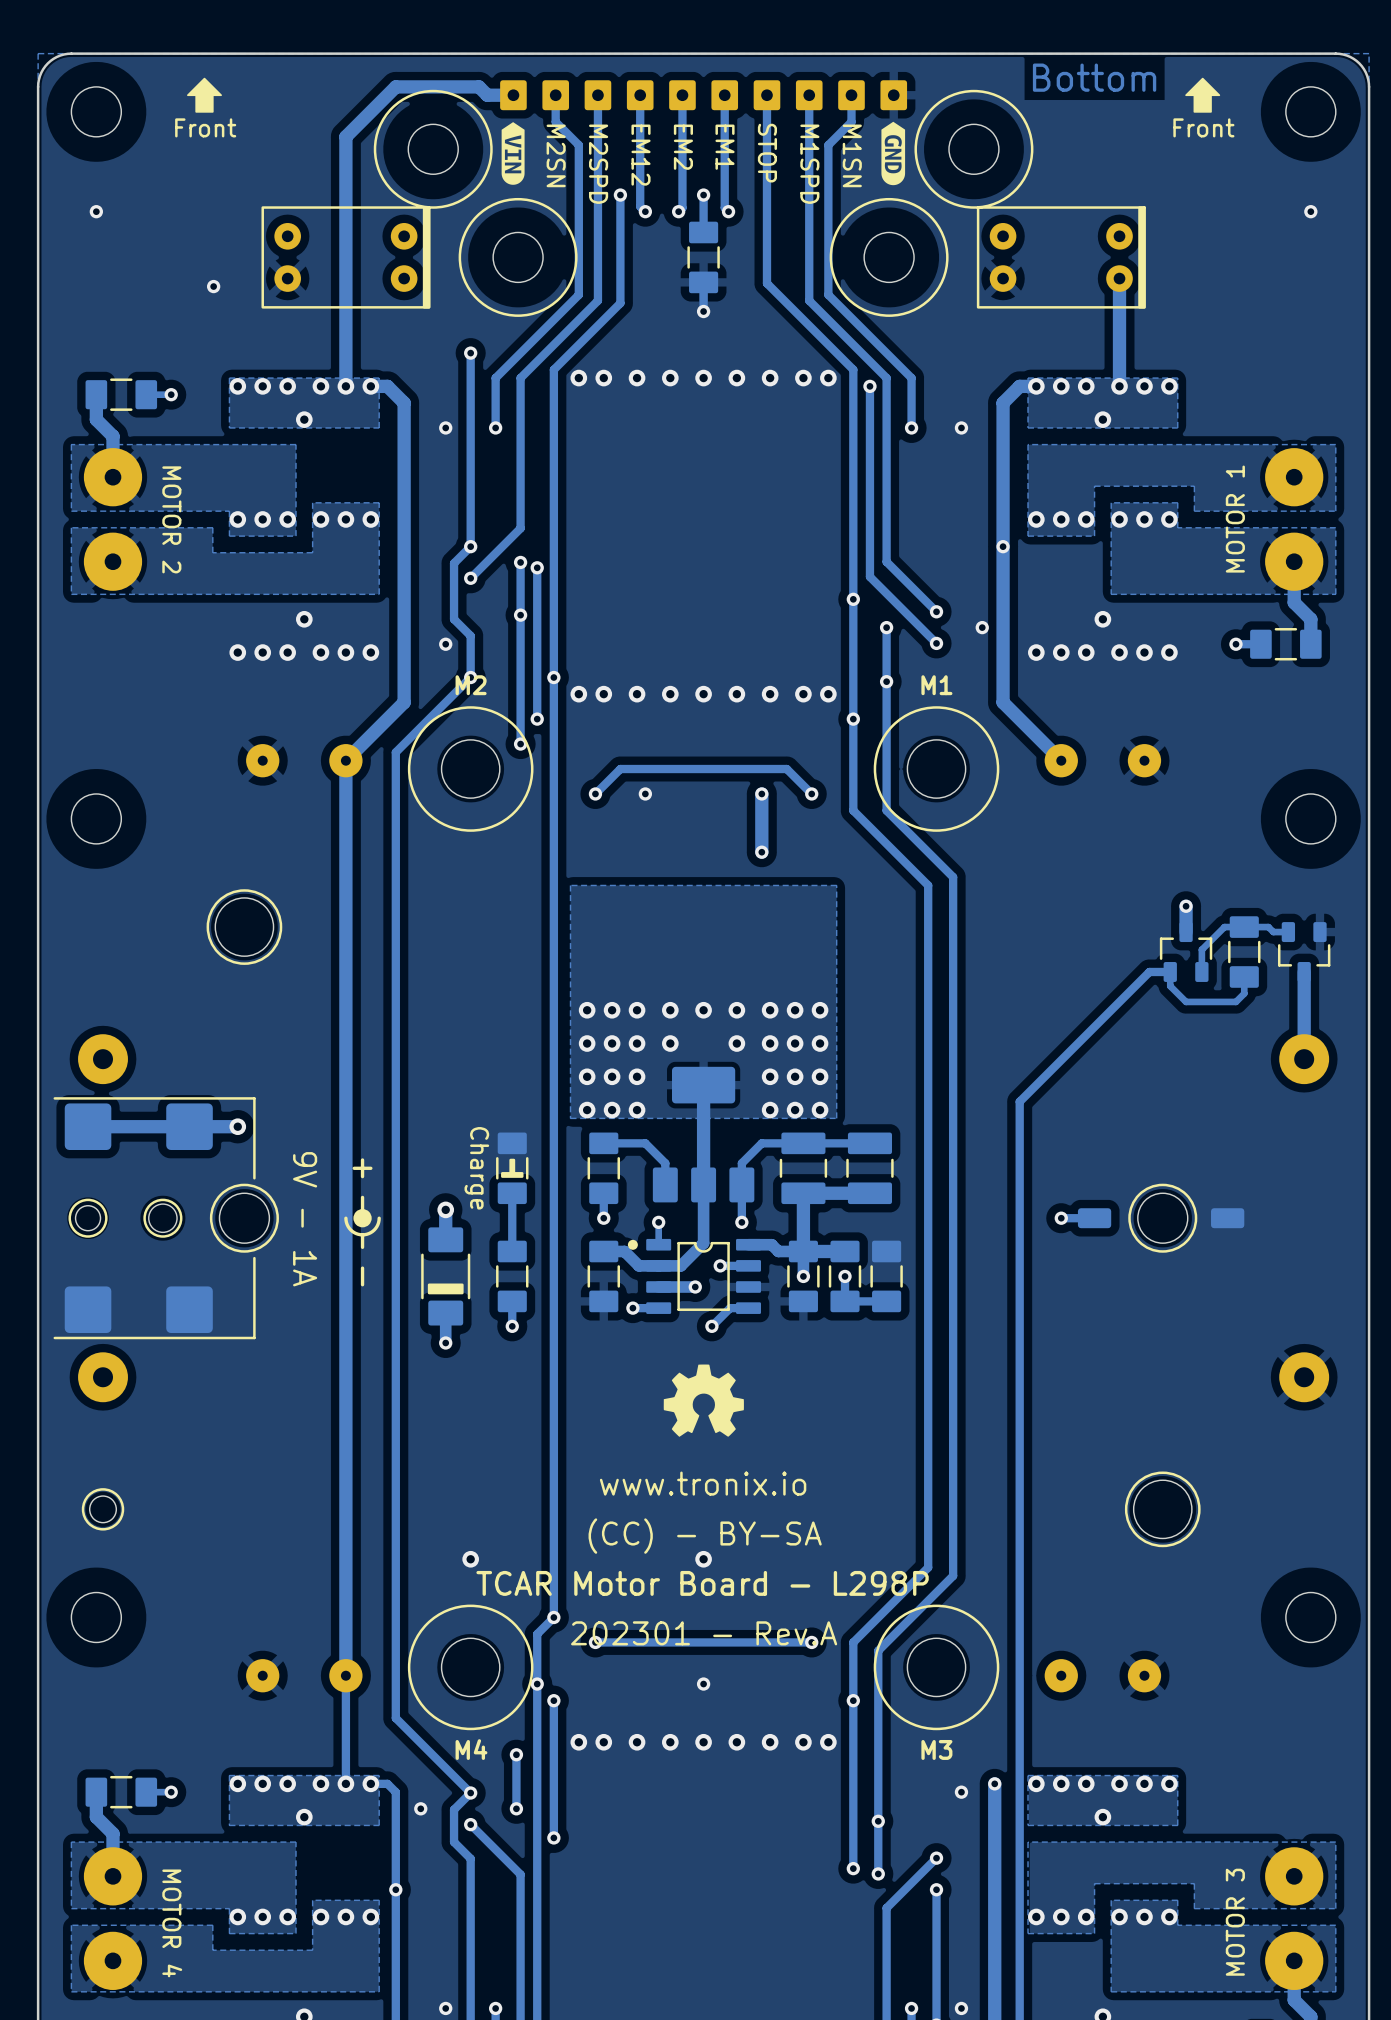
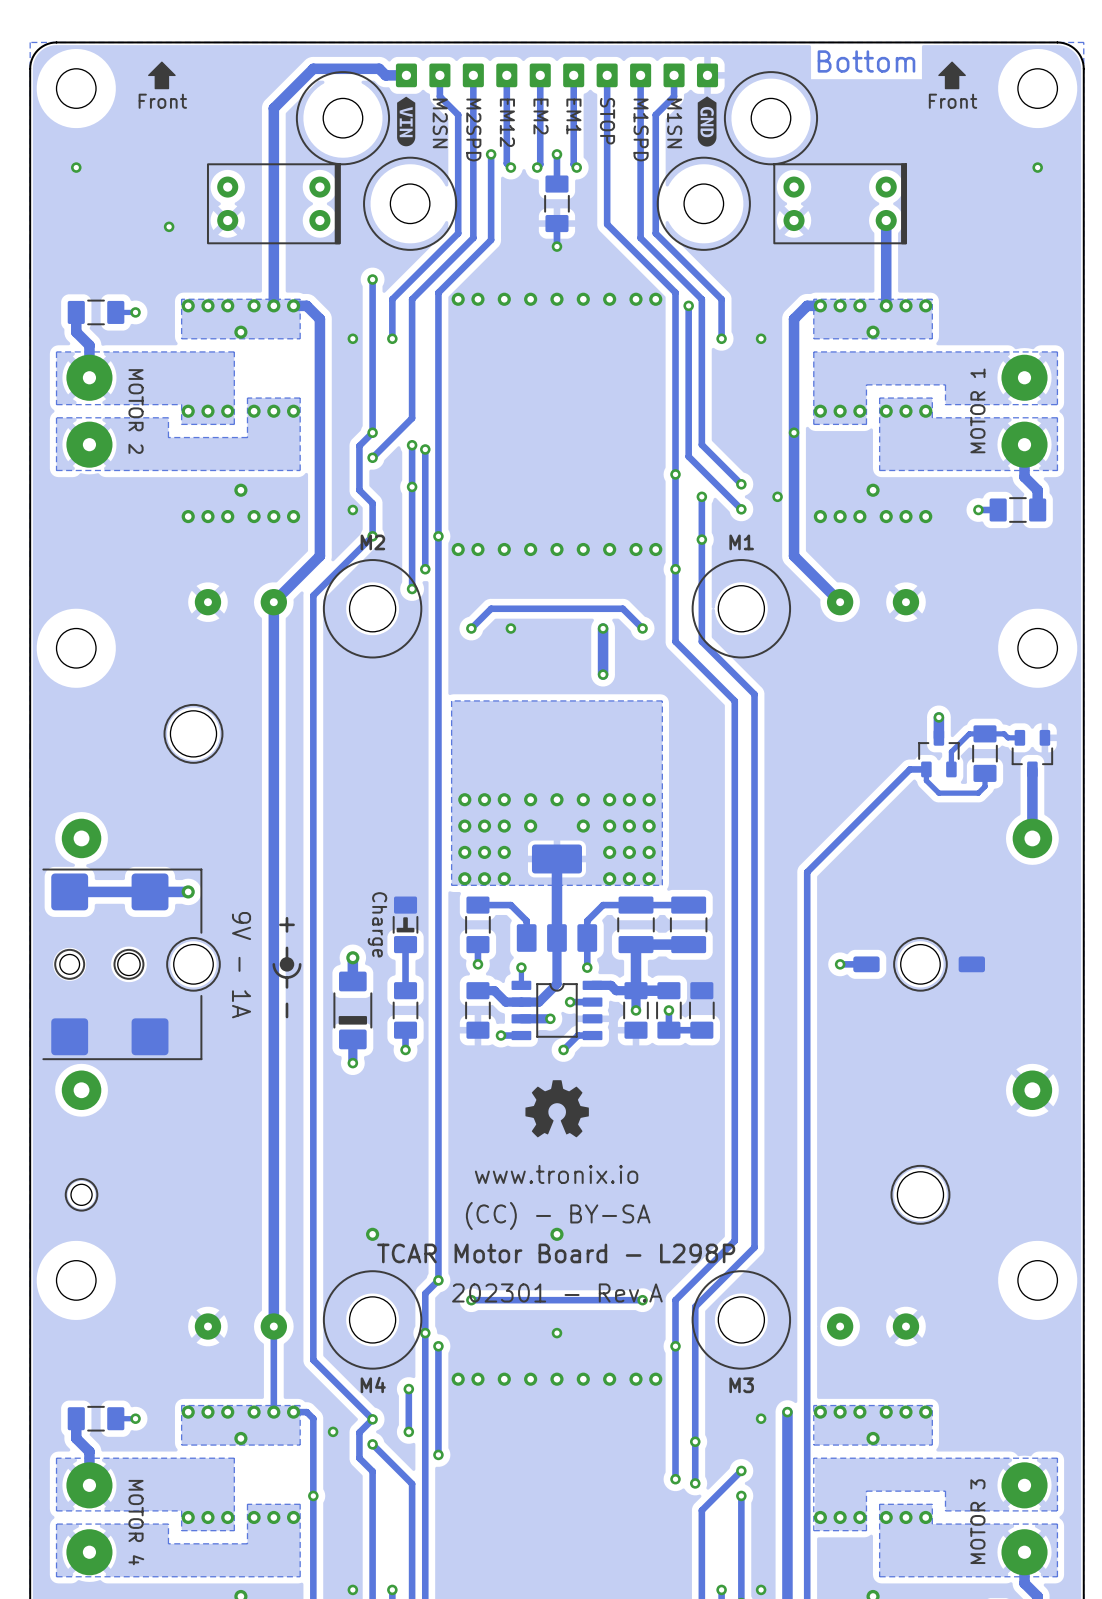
drawing: [627, 1239, 638, 1250] -> none

